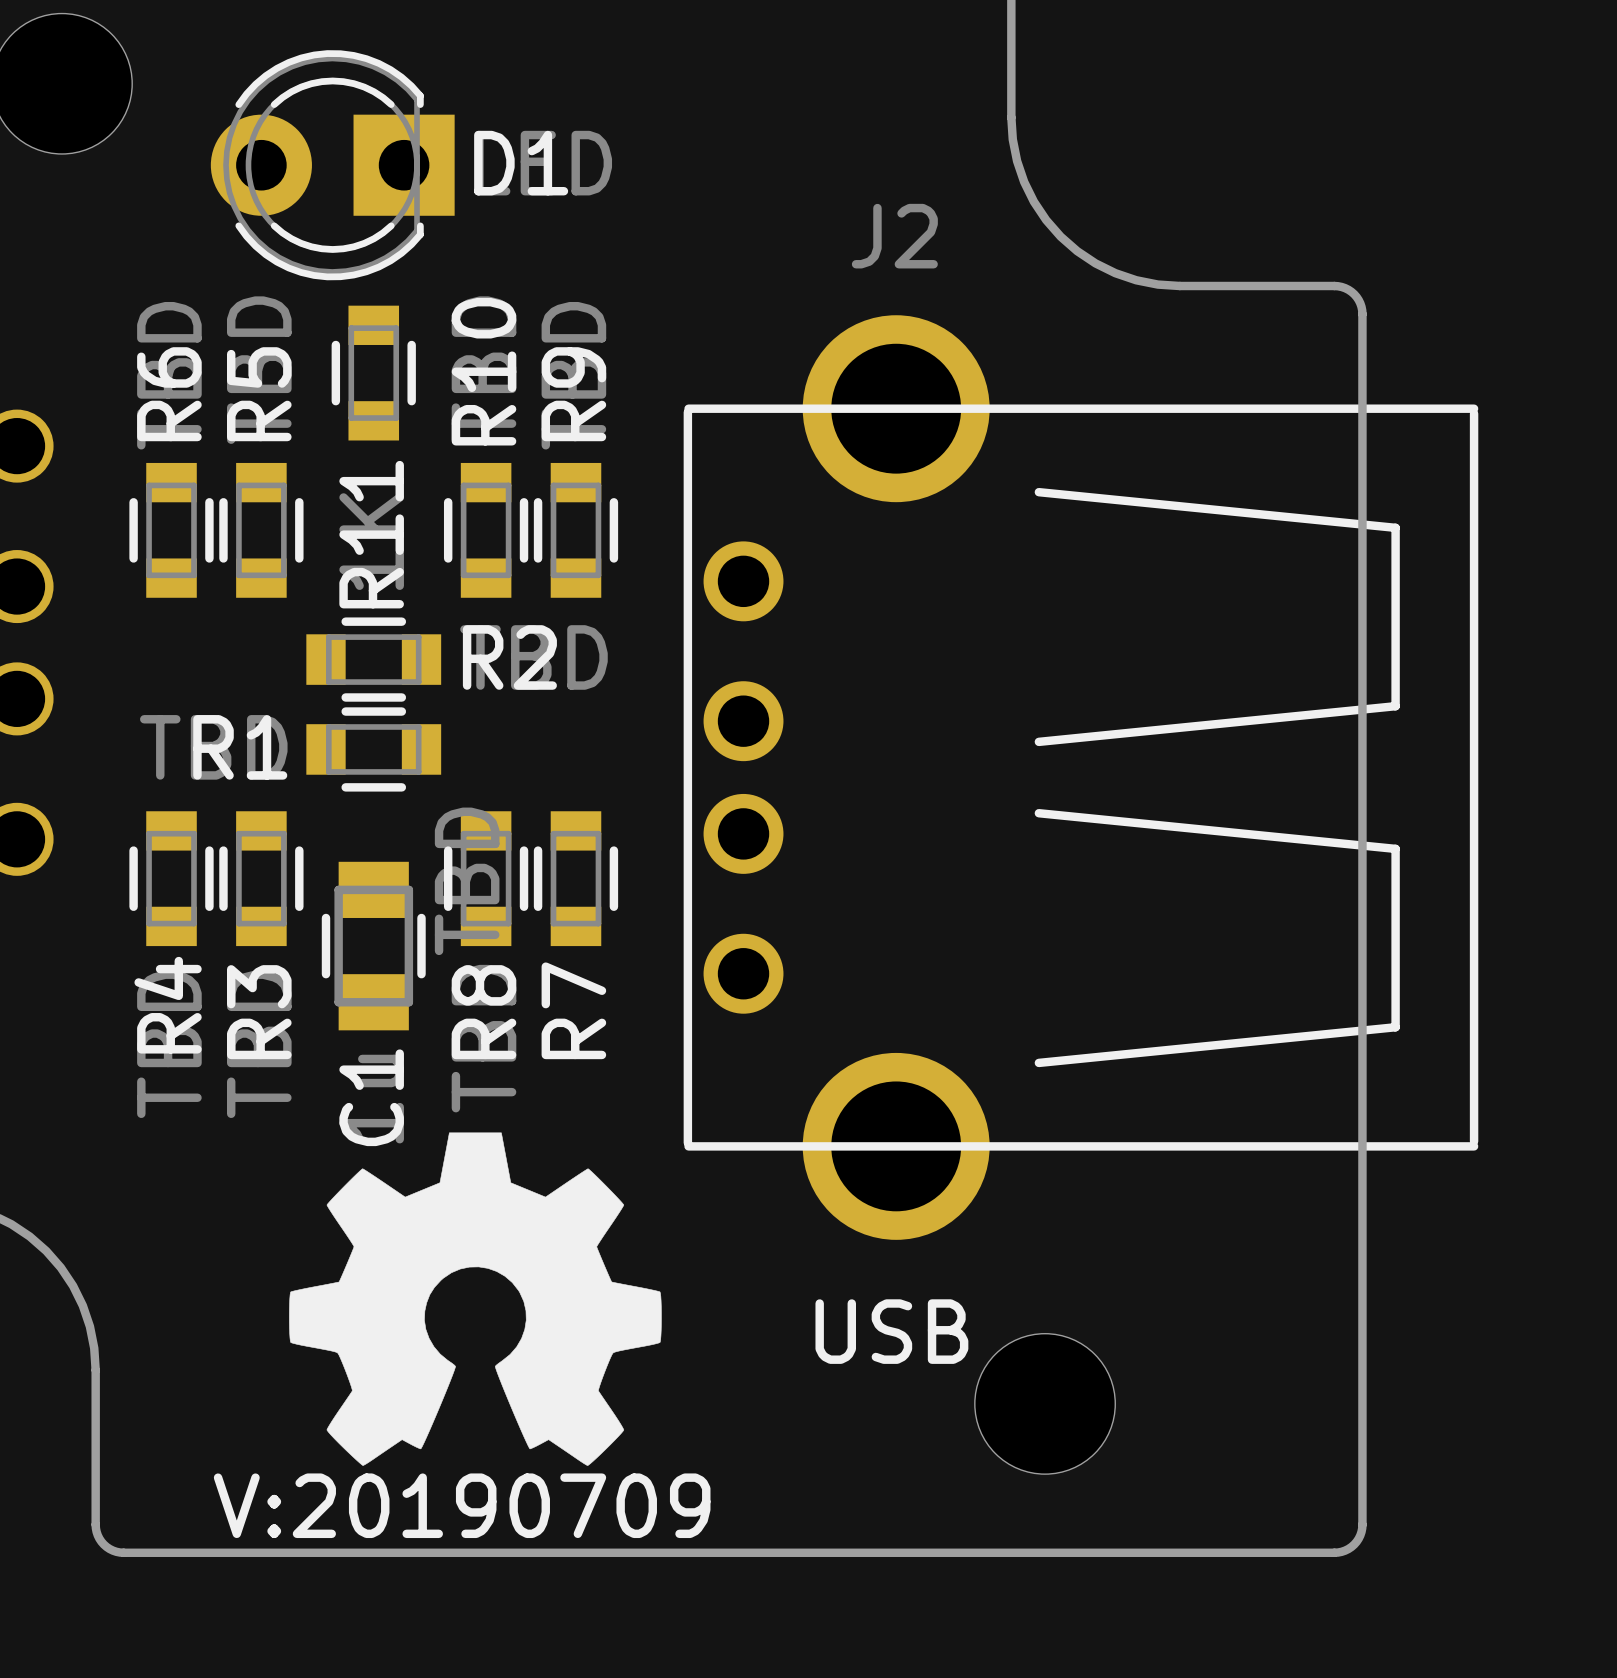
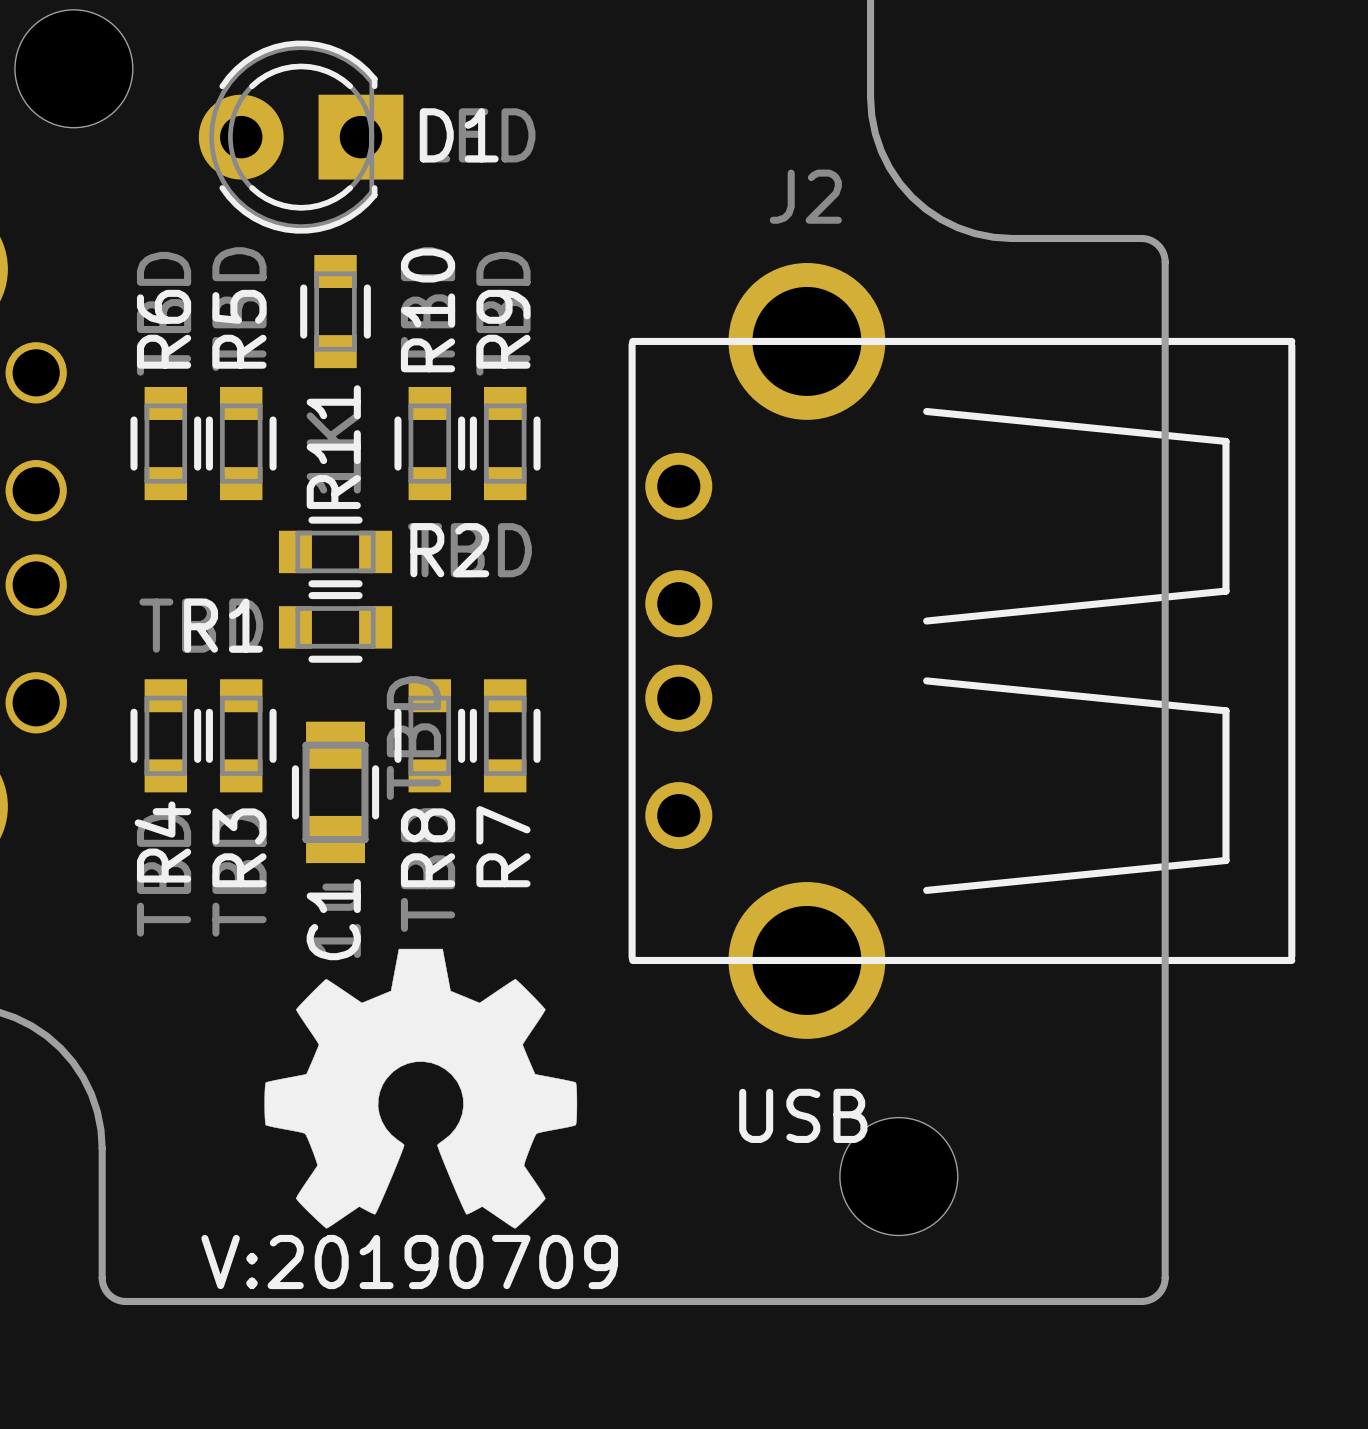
J2 position: (1080, 777) -> (961, 650)

